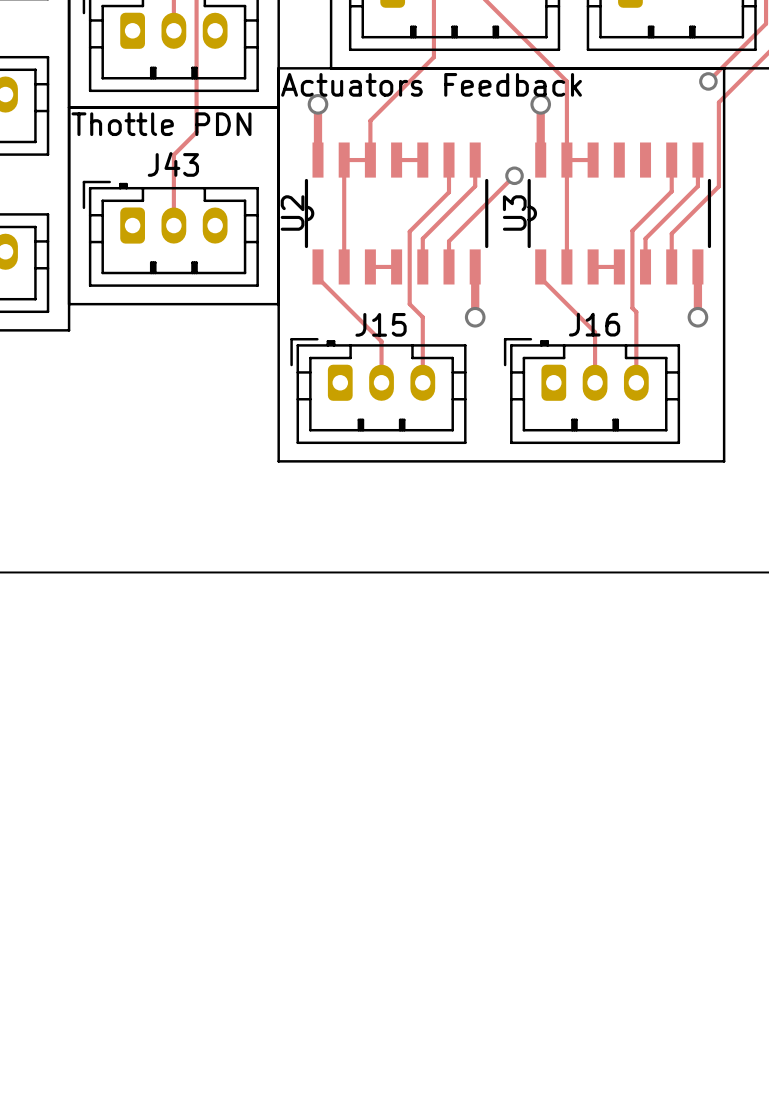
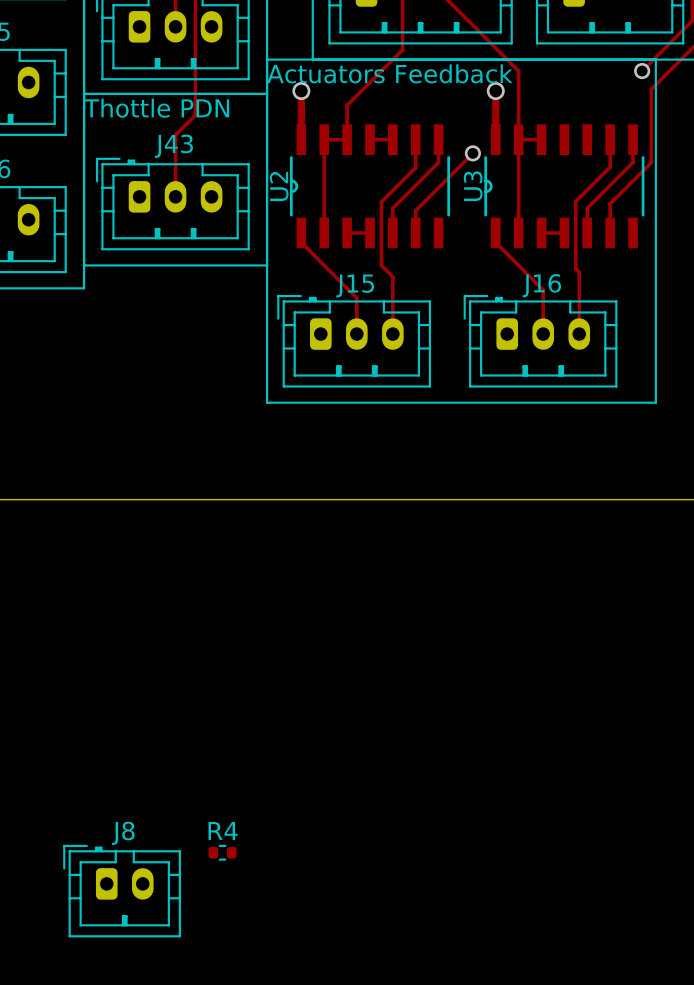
track: (475, 266) (475, 317) -> none
track: (697, 266) (697, 317) -> none
via: (475, 317) -> none
via: (697, 317) -> none
R4: none -> (222, 852)
J8: none -> (122, 891)

